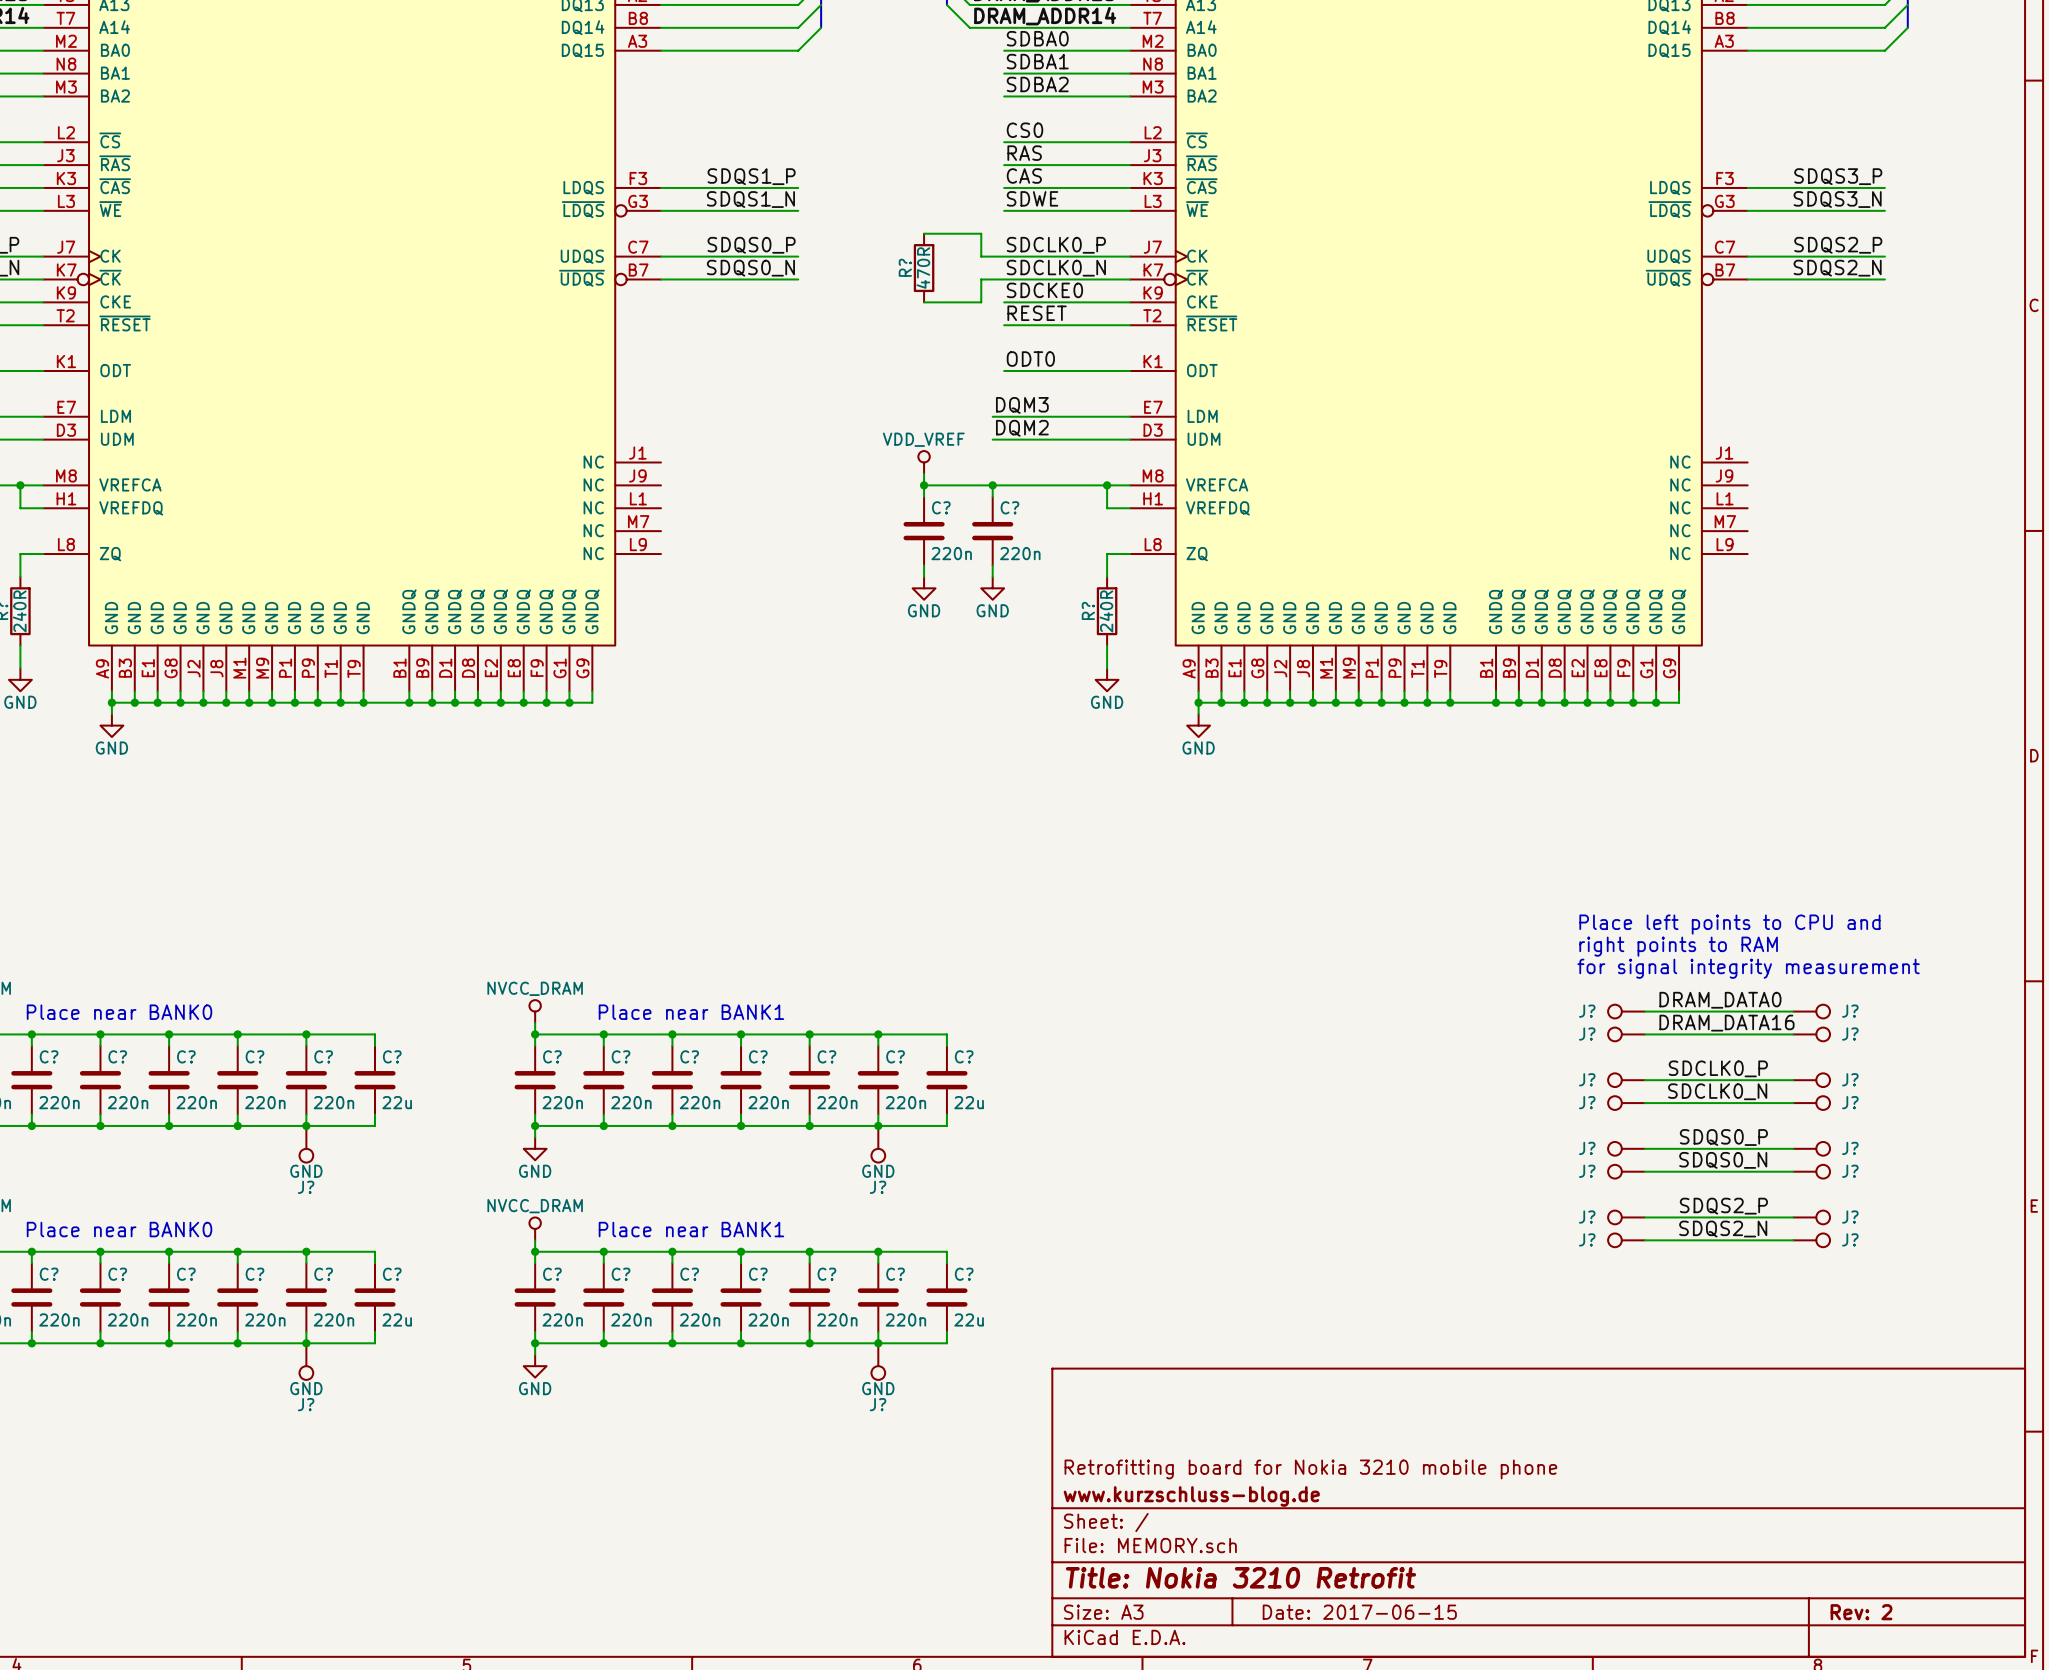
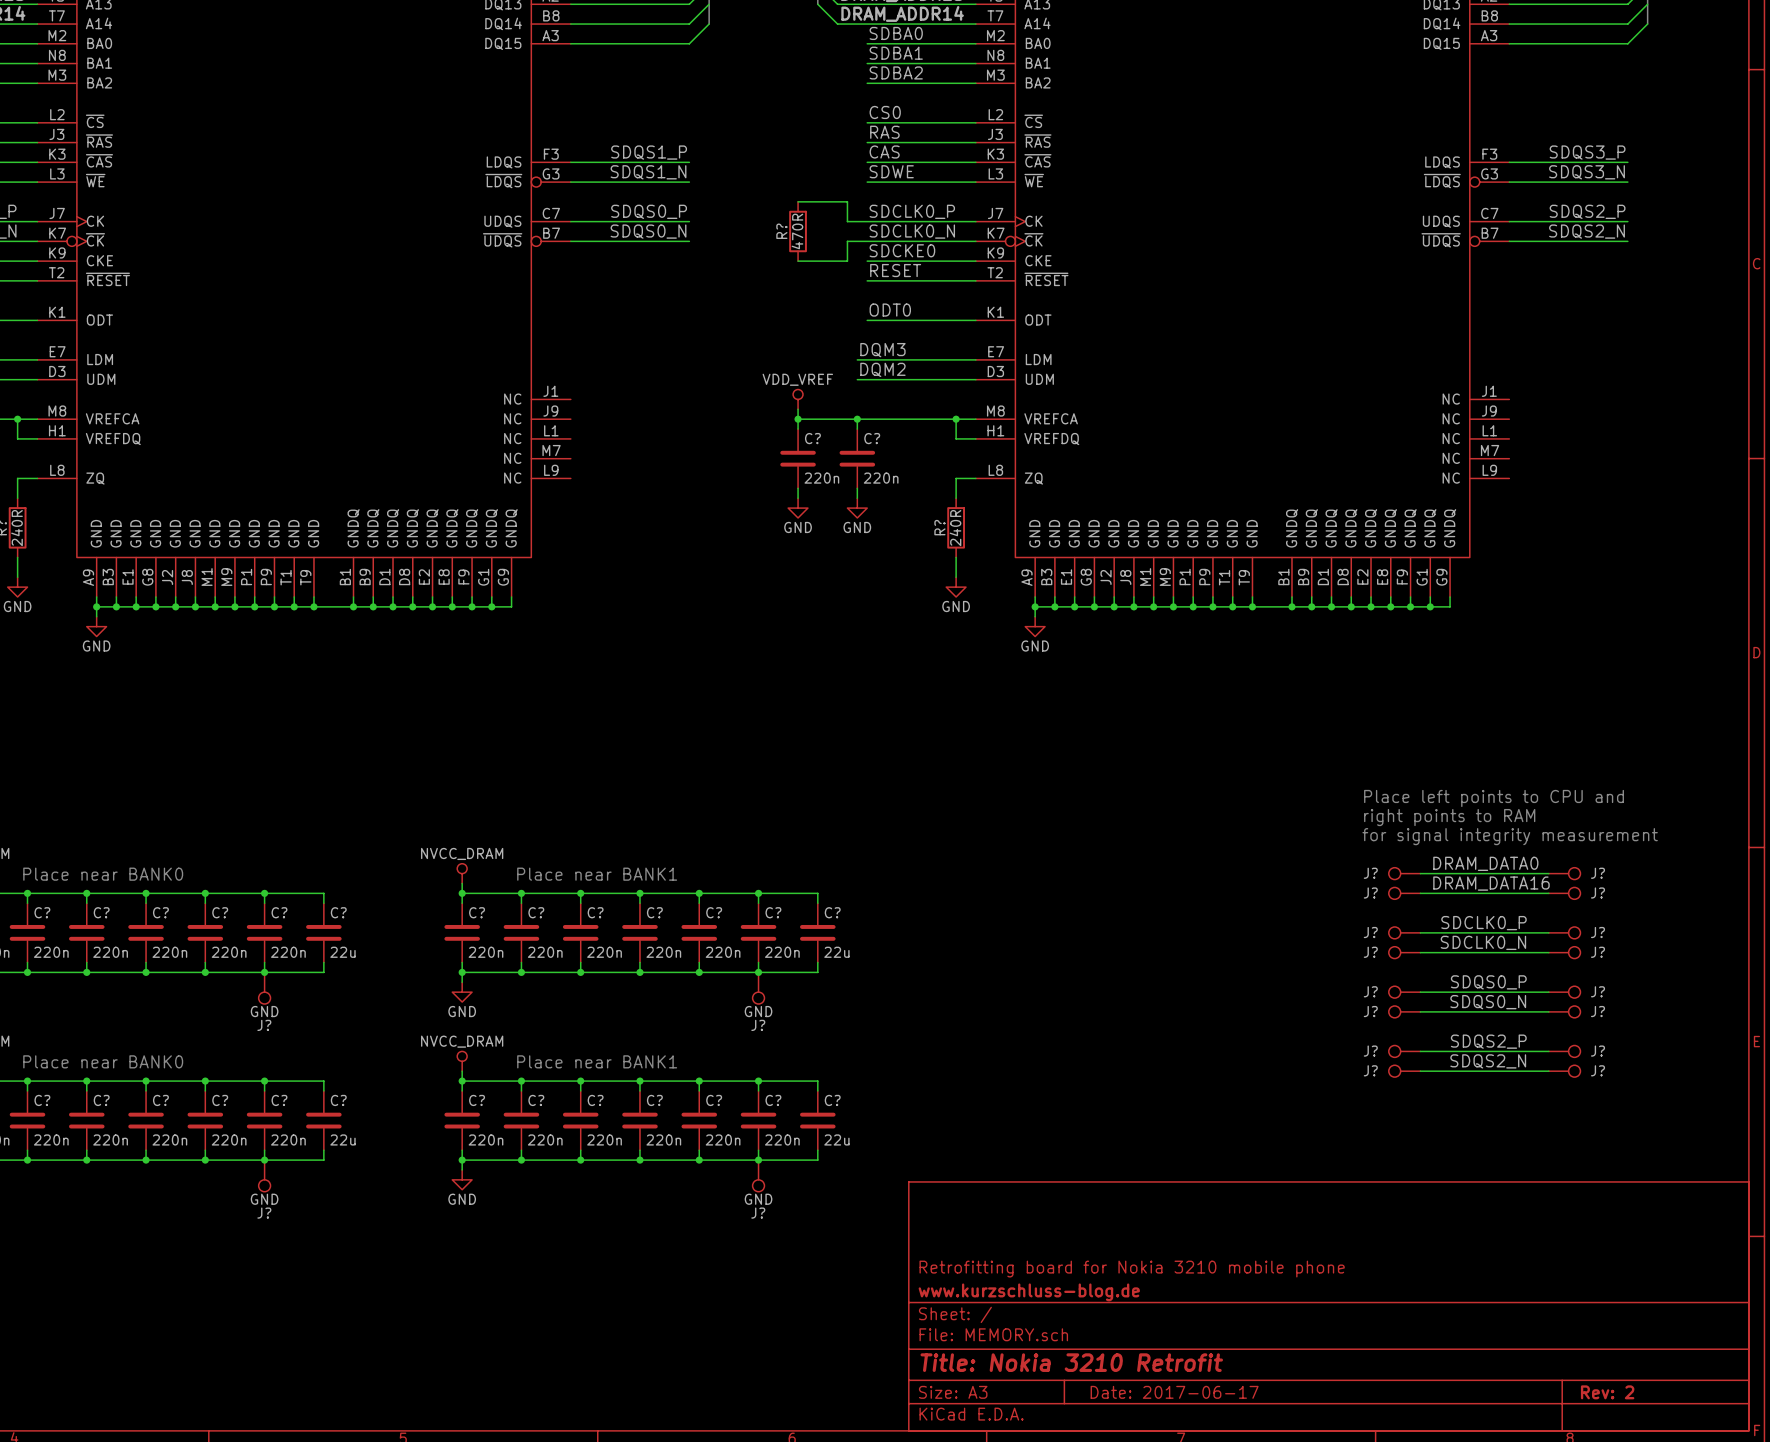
title block: Date: 2017-06-15 (1359, 1612) -> Date: 2017-06-17 (1174, 1392)

